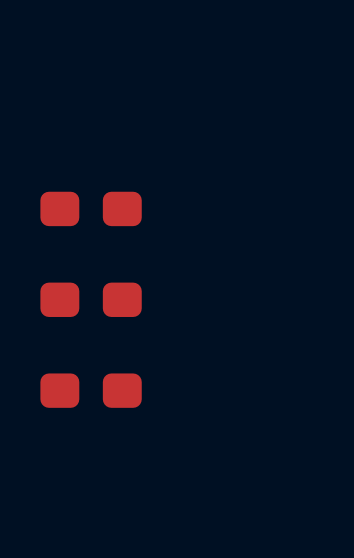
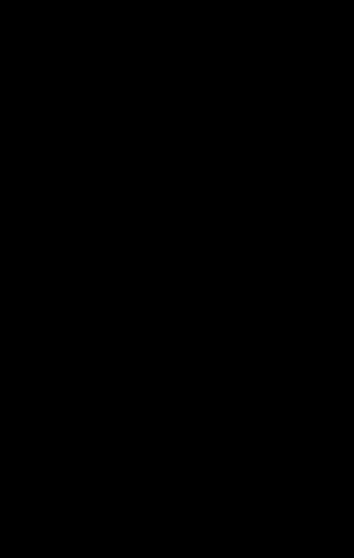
part: (91, 208) -> none
part: (91, 299) -> none
part: (91, 390) -> none

